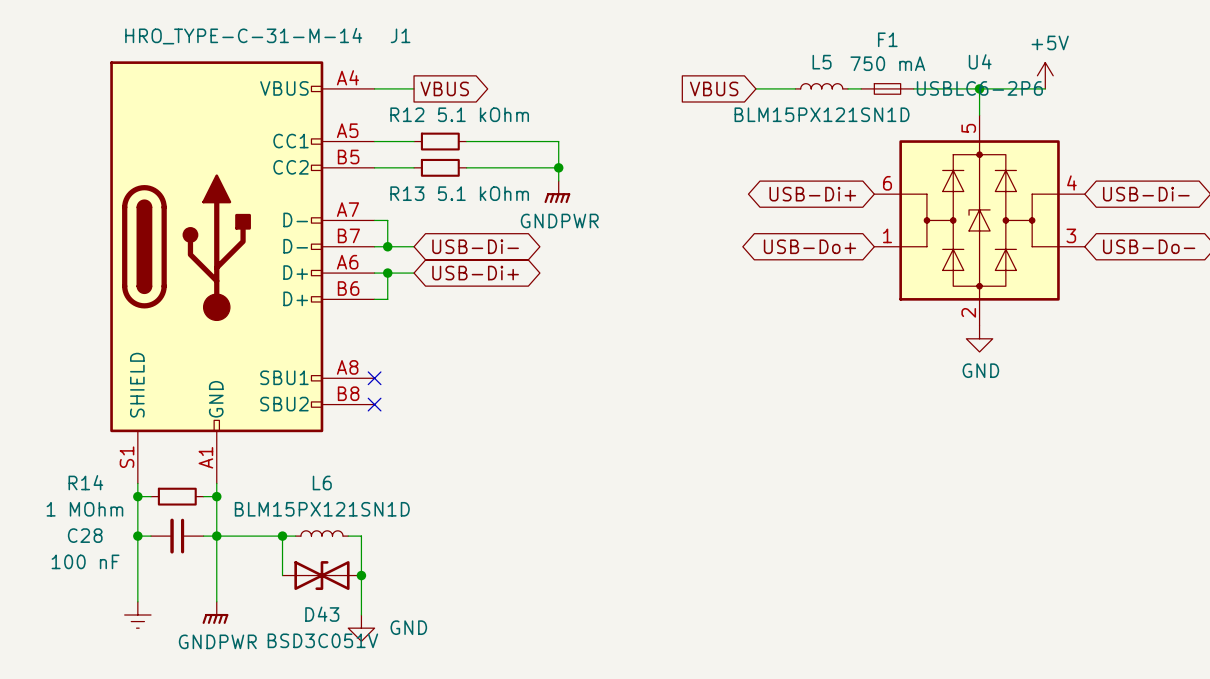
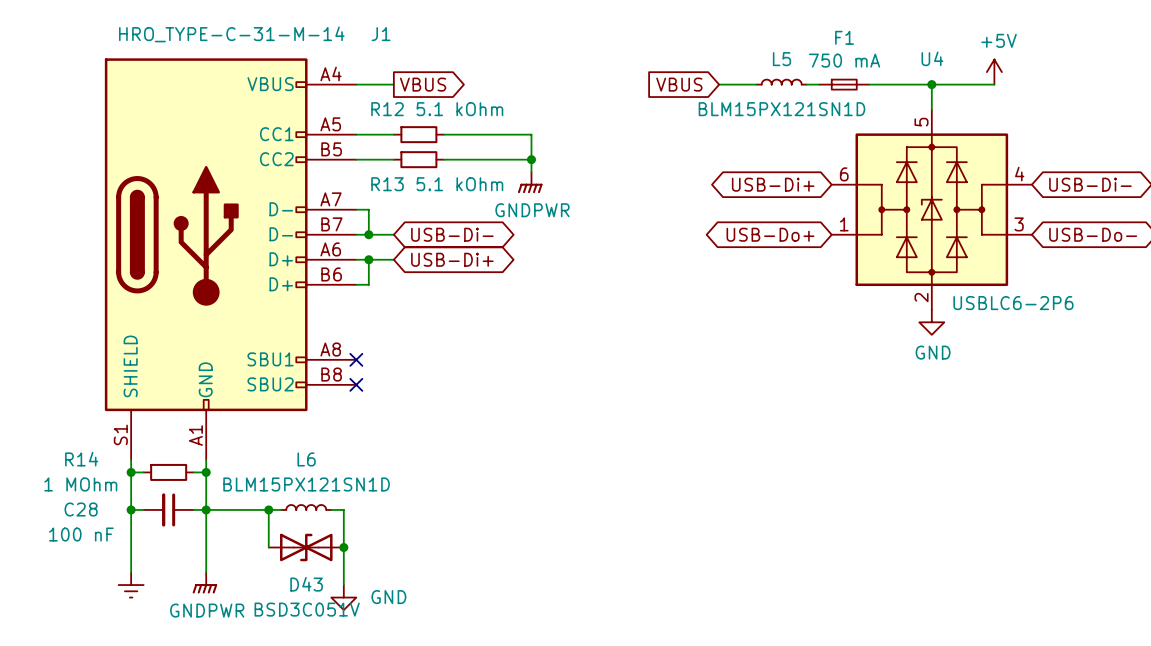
U4 value position: USBLC6-2P6 (979, 88) -> USBLC6-2P6 (1013, 303)

